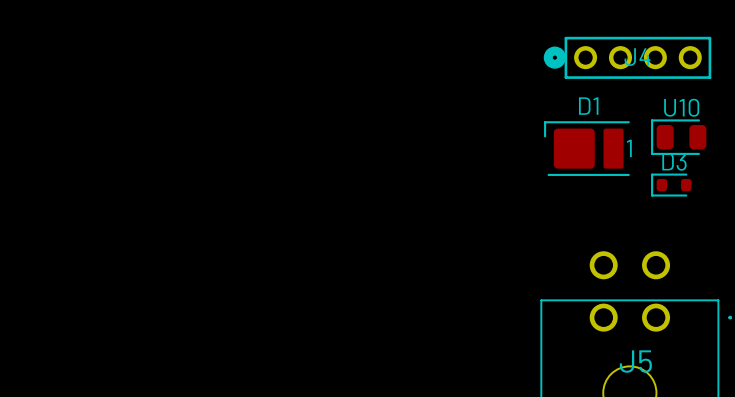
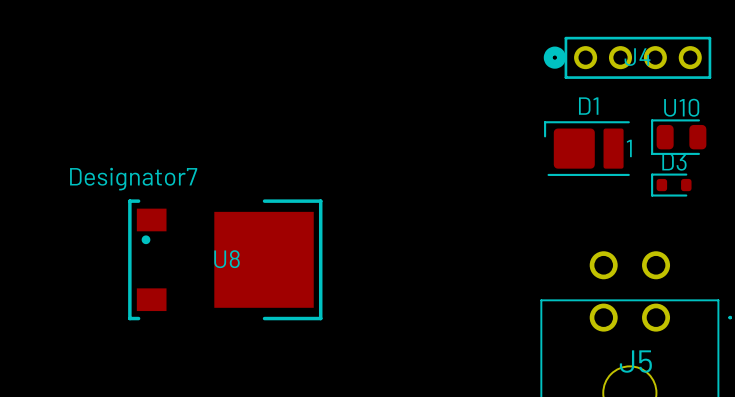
U8: none -> (225, 259)

